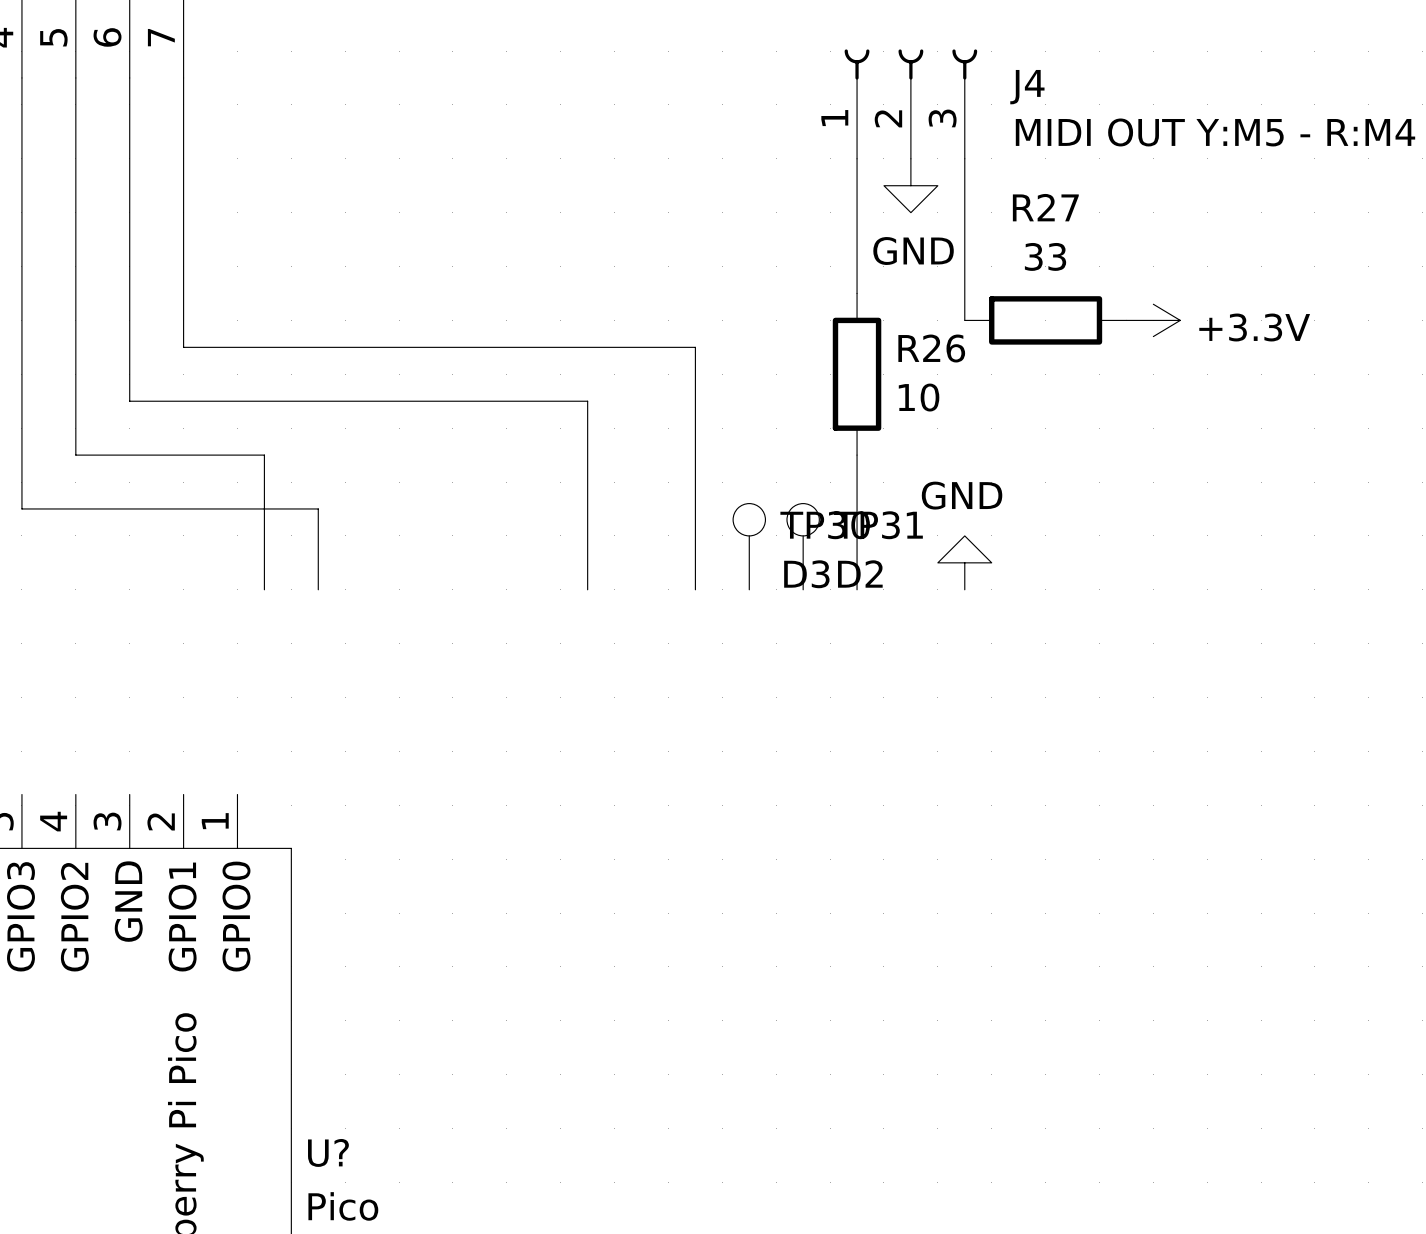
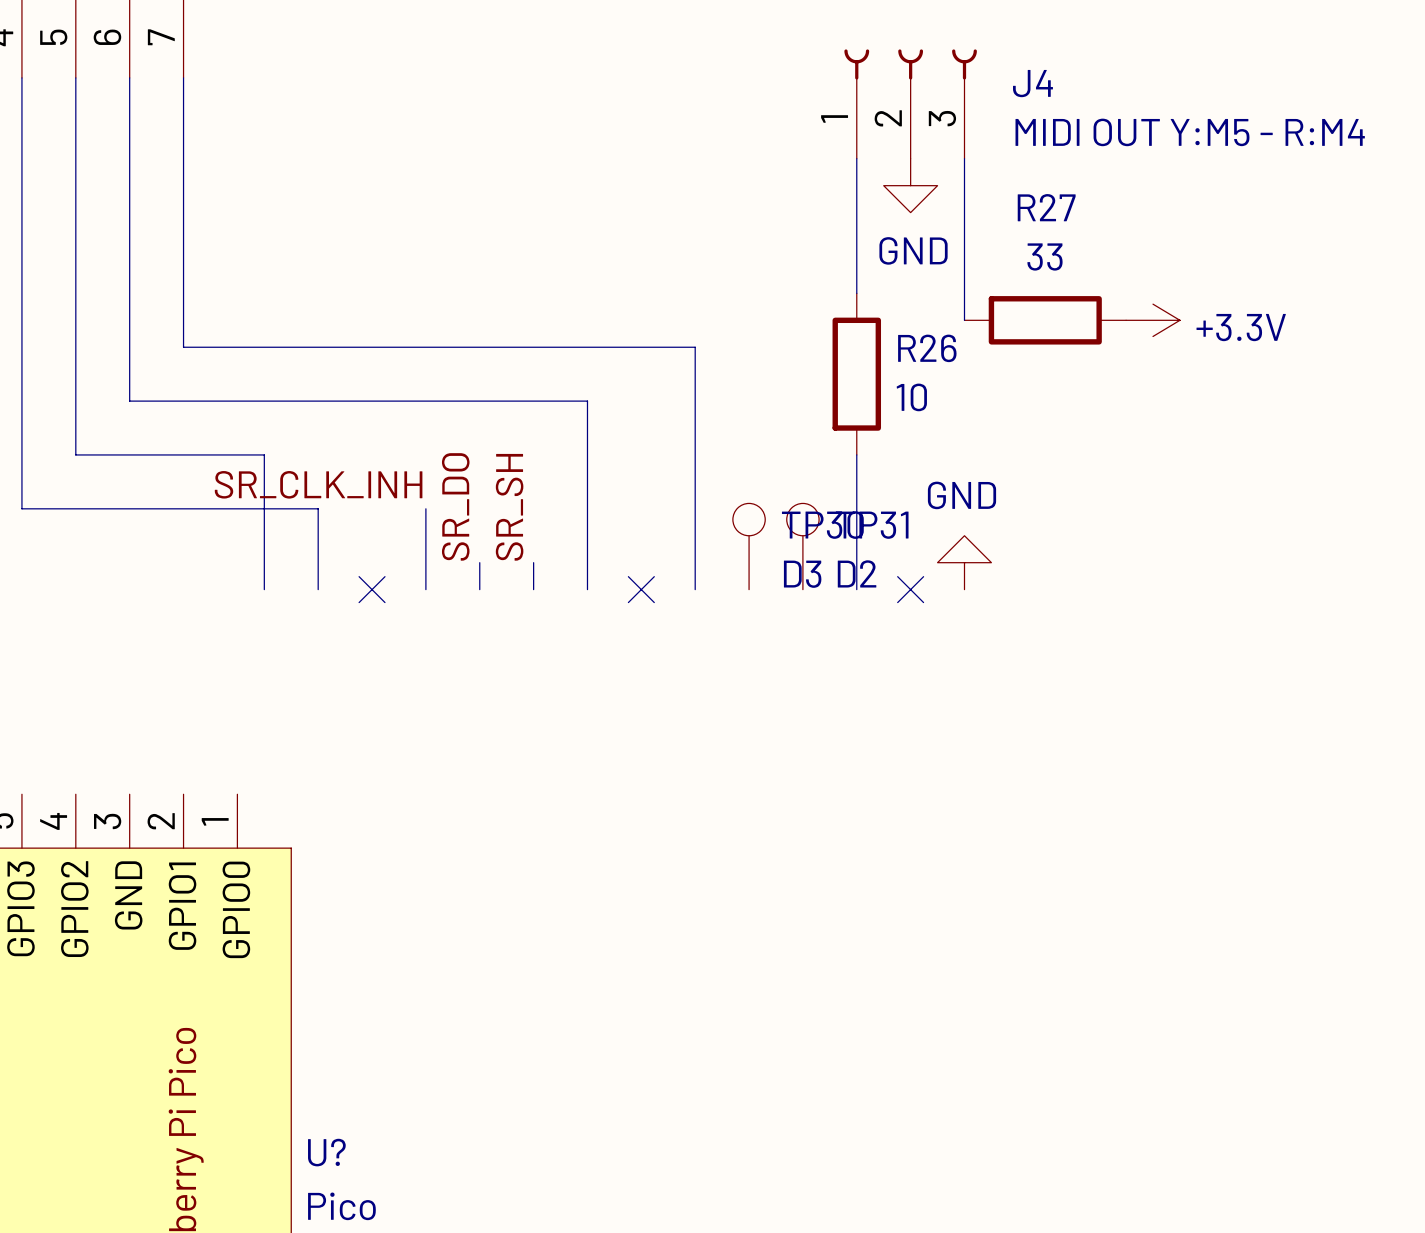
label: none -> SR_CLK_INH (318, 484)
label: none -> SR_DO (455, 506)
label: none -> SR_SH (509, 507)
wire: none -> (425, 508) (425, 589)
wire: none -> (479, 562) (479, 589)
wire: none -> (533, 562) (533, 589)
no-connect mark: none -> (372, 589)
no-connect mark: none -> (641, 589)
no-connect mark: none -> (910, 589)

